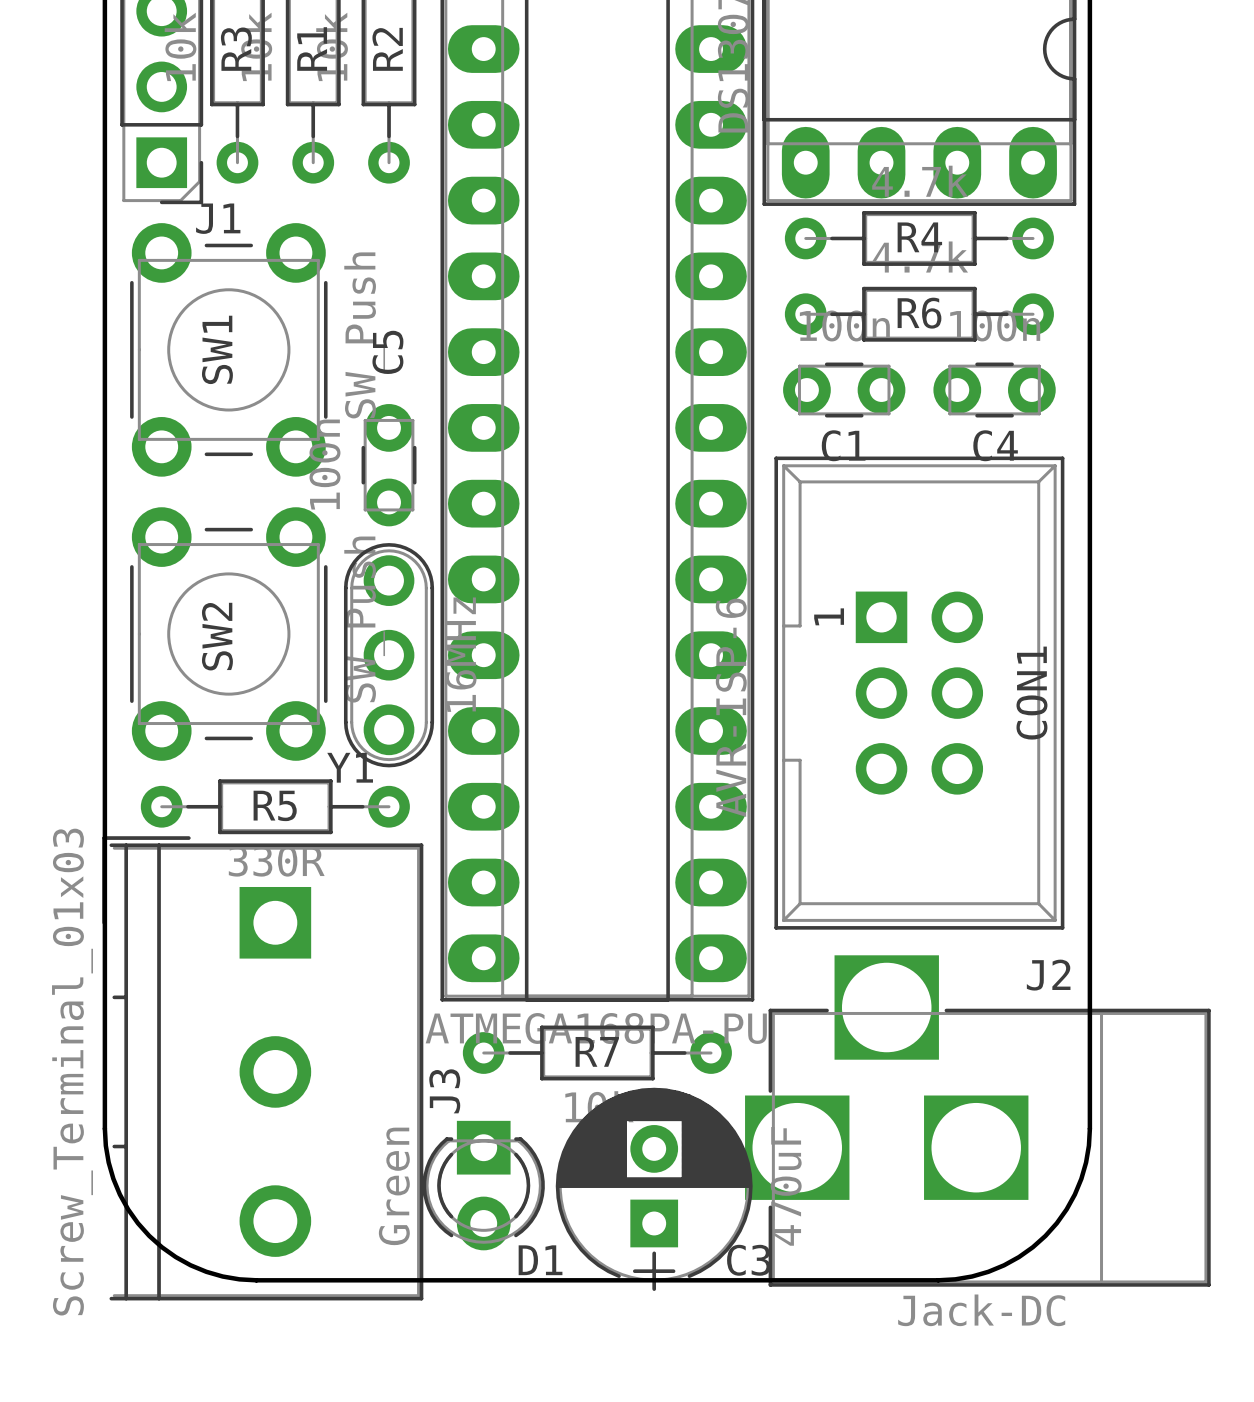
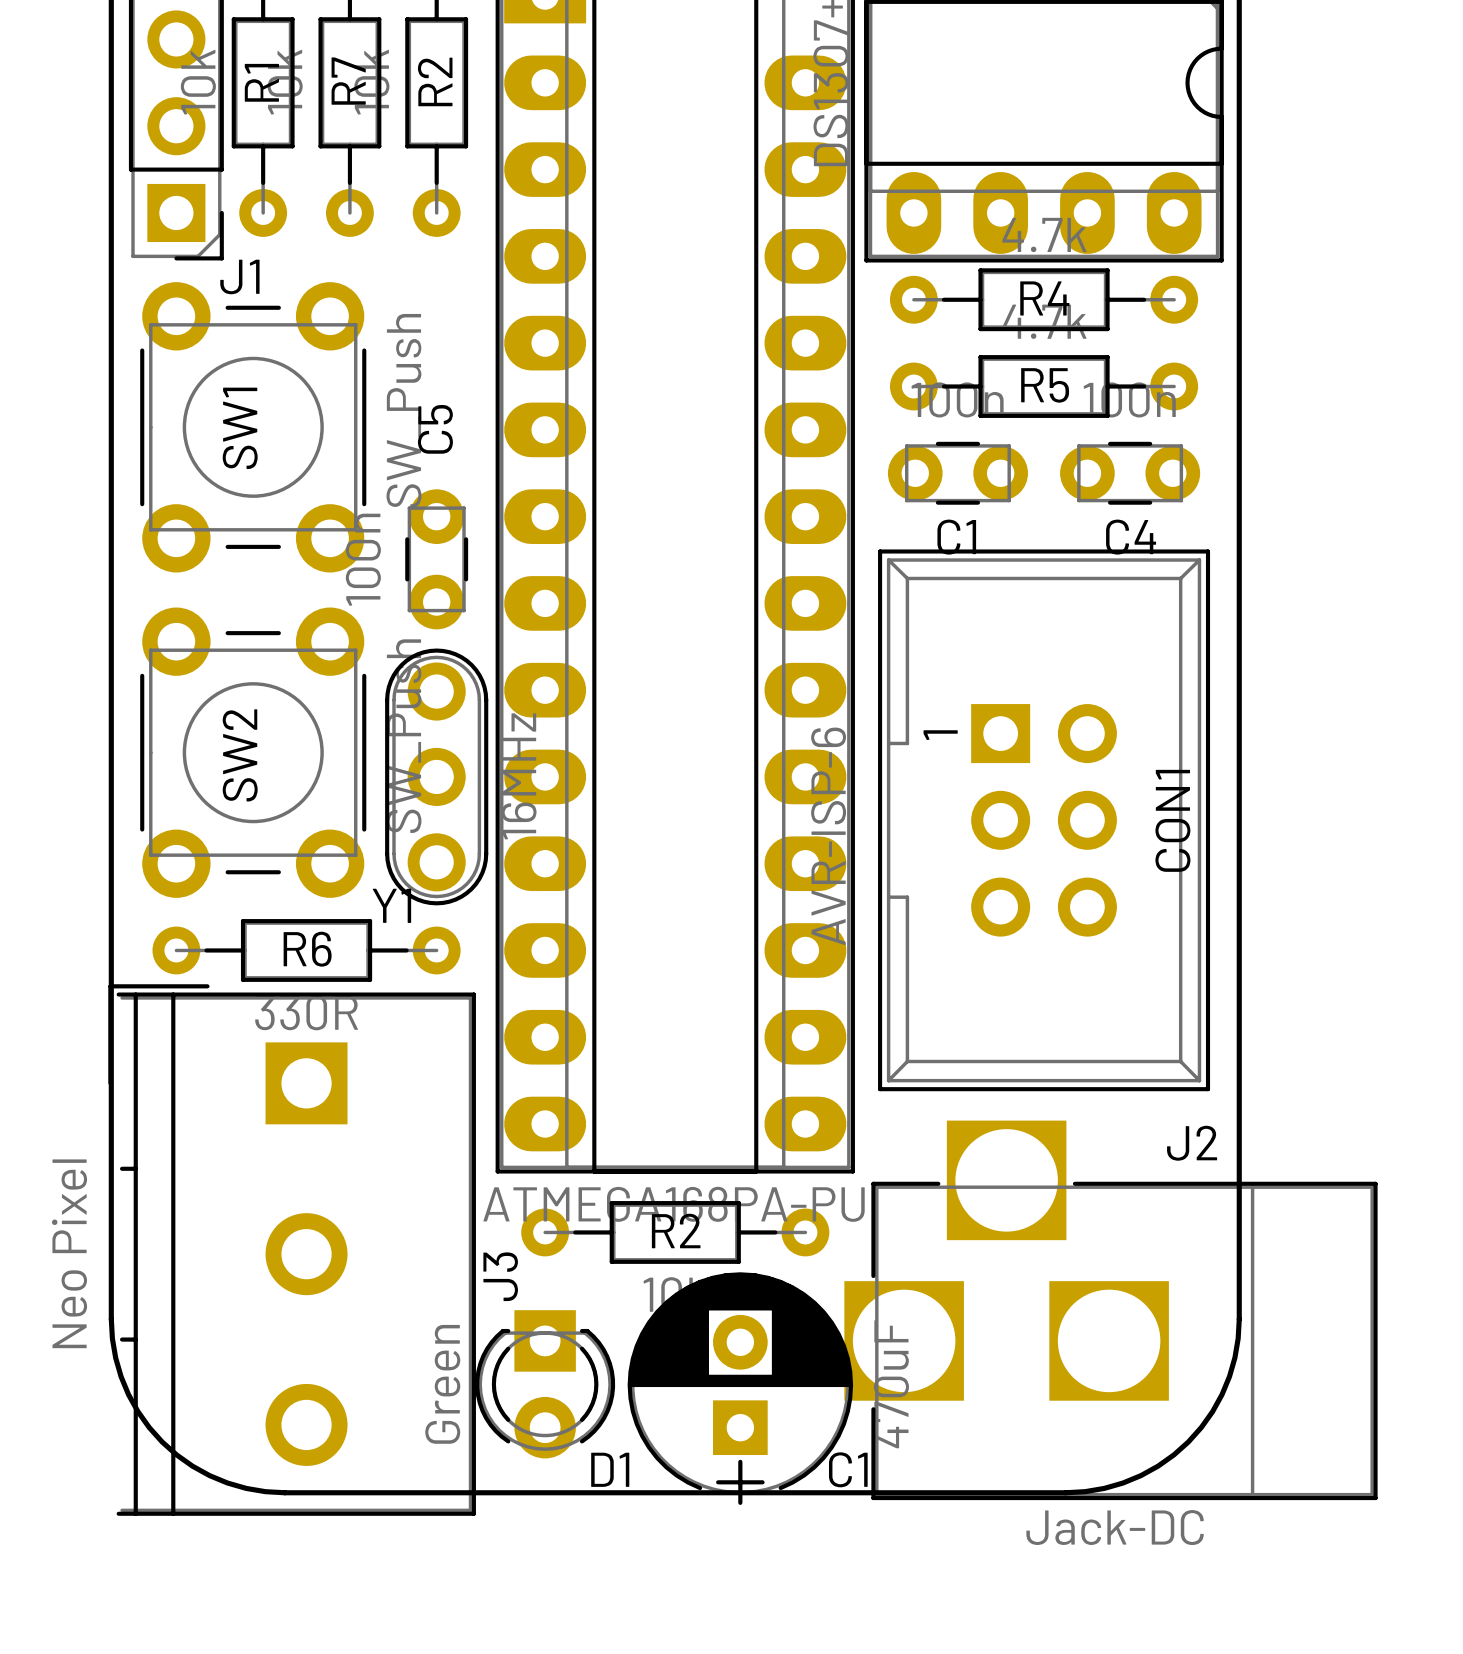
R3 name: R3 (236, 49) -> R1 (261, 82)
R1 name: R1 (312, 49) -> R7 (348, 81)
R6 name: R6 (919, 313) -> R5 (1045, 385)
R5 name: R5 (275, 805) -> R6 (307, 949)
R7 name: R7 (597, 1051) -> R2 (676, 1230)
J3 value: Screw_Terminal_01x03 (72, 1072) -> Neo Pixel (69, 1253)
C3 name: C3 (748, 1260) -> C1 (848, 1469)

